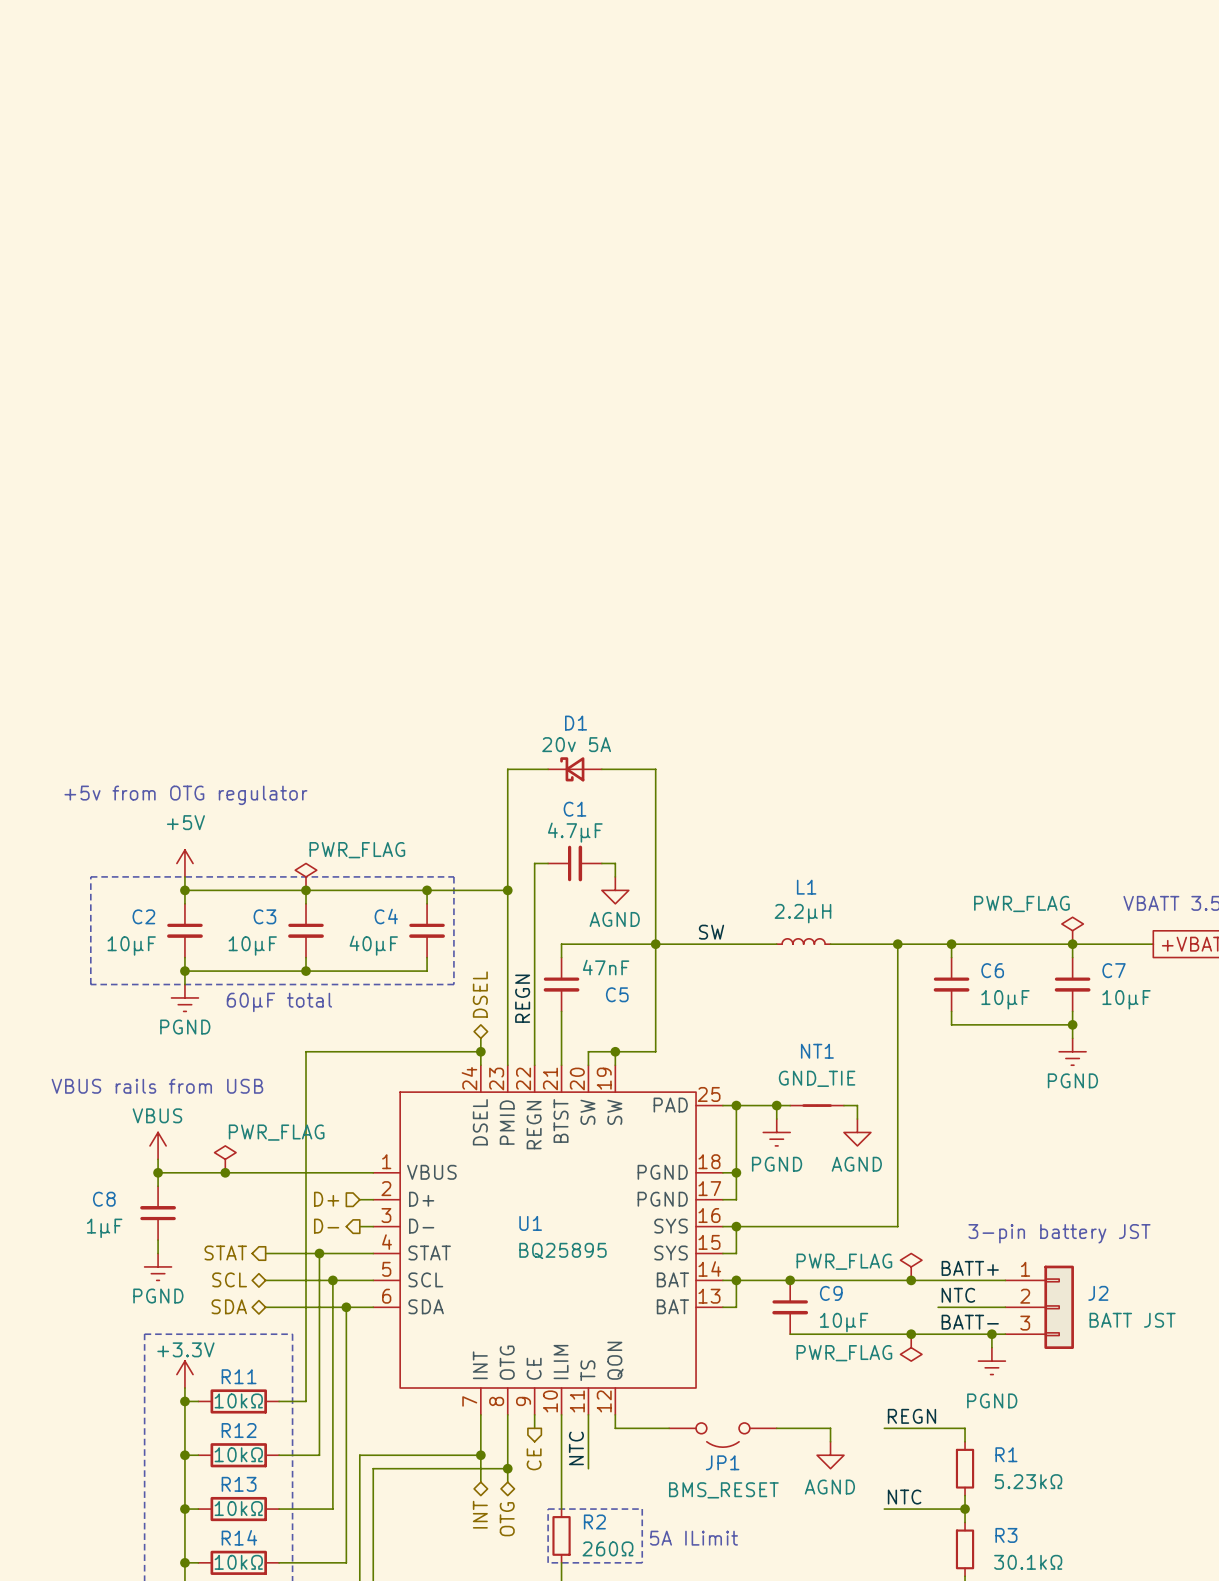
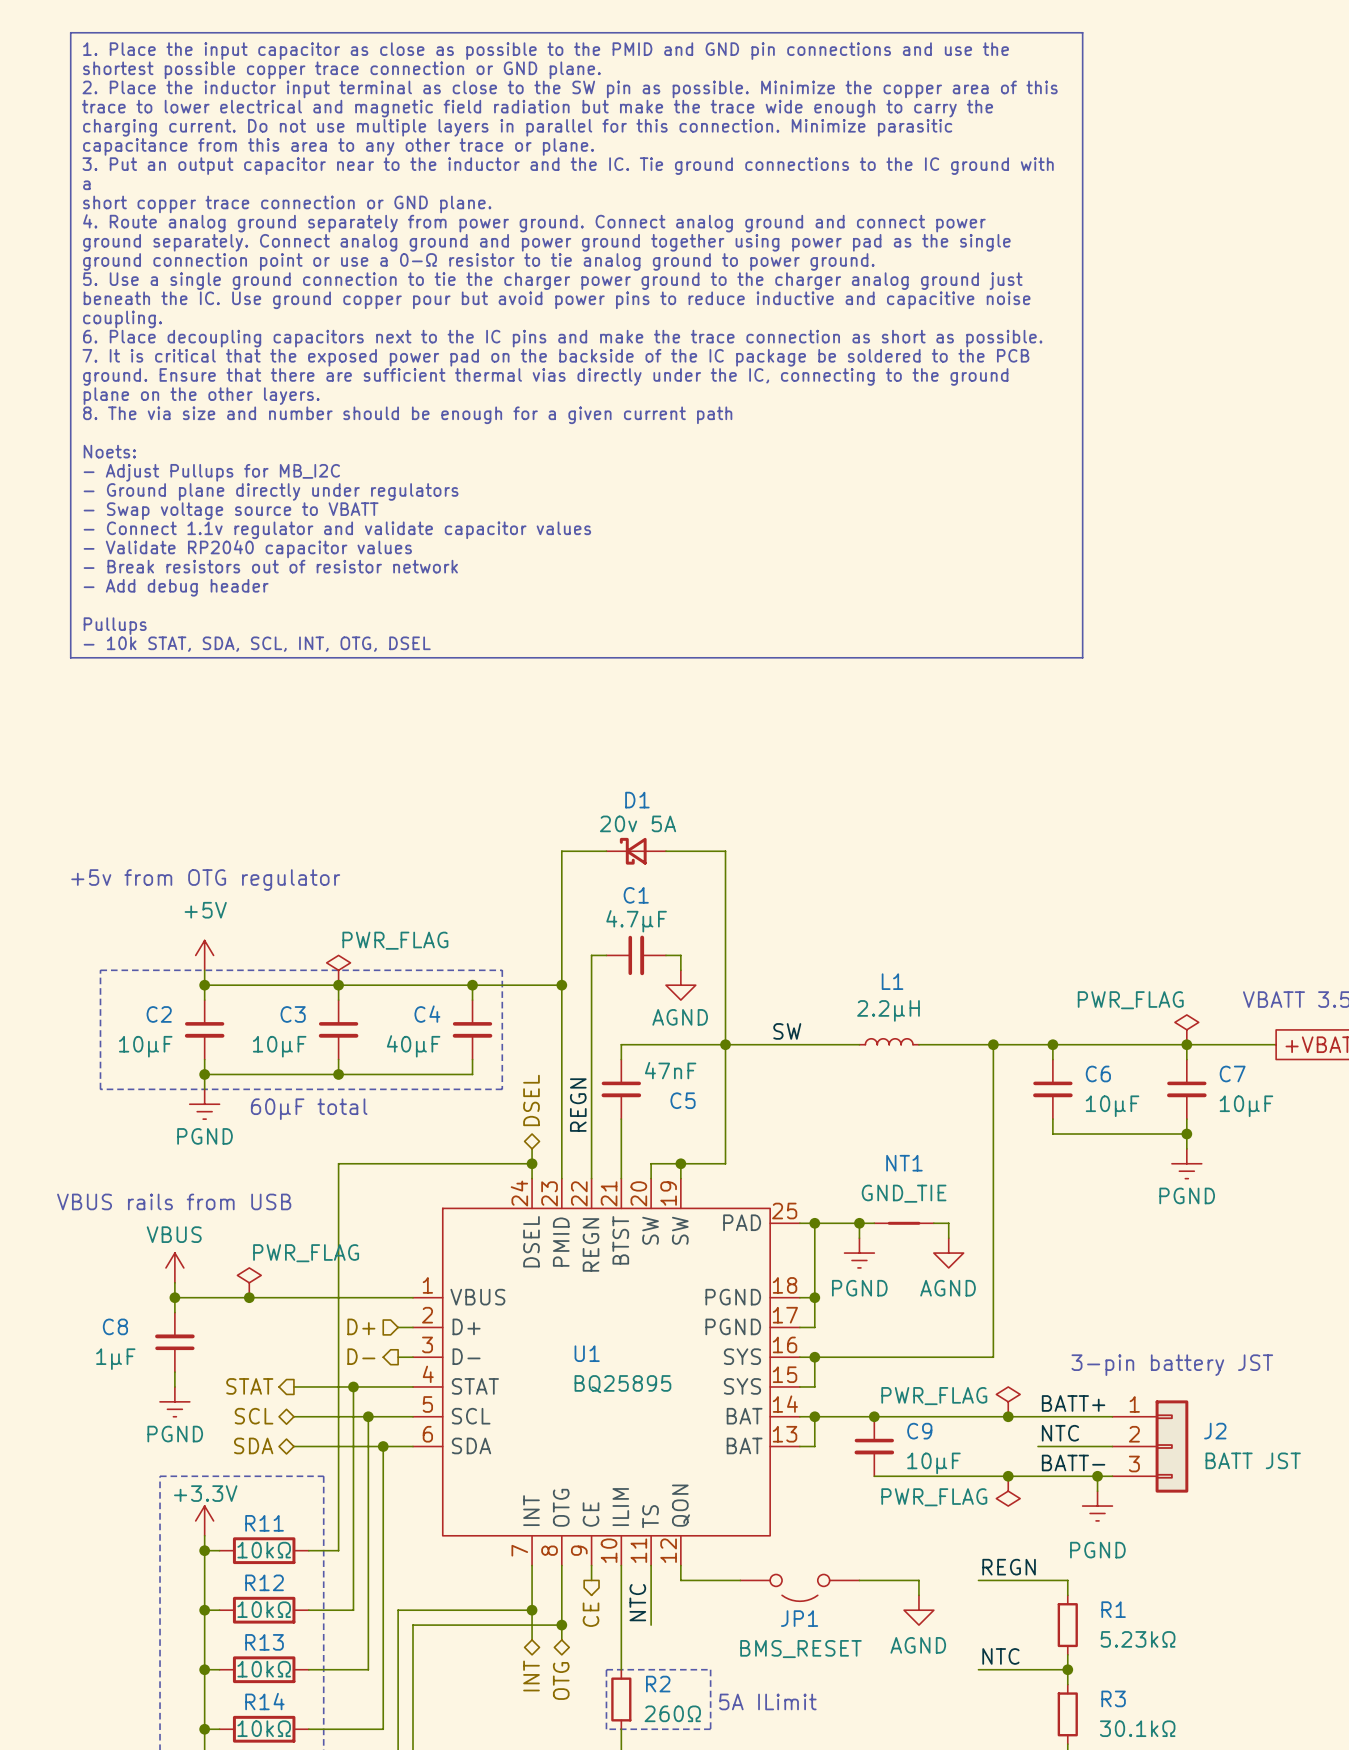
line: none -> (70, 32) (1082, 32) (1082, 657) (70, 657) (70, 32)
text: none -> 1. Place the input capacitor as close as possible to the PMID and GND pin connections and use the (546, 51)
text: none -> shortest possible copper trace connection or GND plane. (341, 70)
text: none -> 2. Place the inductor input terminal as close to the SW pin as possible. Minimize the copper area of this (570, 89)
text: none -> trace to lower electrical and magnetic field radiation but make the trace wide enough to carry the (537, 108)
text: none -> charging current. Do not use multiple layers in parallel for this connection. Minimize parasitic (517, 127)
text: none -> capacitance from this area to any other trace or plane. (338, 146)
text: none -> 3. Put an output capacitor near to the inductor and the IC. Tie ground connections to the IC ground with (568, 166)
text: none -> a (86, 185)
text: none -> short copper trace connection or GND plane. (287, 204)
text: none -> 4. Route analog ground separately from power ground. Connect analog ground and connect power (534, 223)
text: none -> ground separately. Connect analog ground and power ground together using power pad as the single (546, 242)
text: none -> ground connection point or use a 0-Ω resistor to tie analog ground to power ground. (478, 261)
text: none -> 5. Use a single ground connection to tie the charger power ground to the charger analog ground just (552, 281)
text: none -> beneath the IC. Use ground copper pour but avoid power pins to reduce inductive and capacitive noise (557, 300)
text: none -> coupling. (122, 319)
text: none -> 6. Place decoupling capacitors next to the IC pins and make the trace connection as short as possible. (562, 338)
text: none -> 7. It is critical that the exposed power pad on the backside of the IC package be soldered to the PCB (555, 357)
text: none -> ground. Ensure that there are sufficient thermal vias directly under the IC, connecting to the ground (545, 376)
text: none -> plane on the other layers. (201, 396)
text: none -> 8. The via size and number should be enough for a given current path (407, 415)
text: none -> Noets: (109, 451)
text: none -> - Adjust Pullups for MB_I2C (211, 472)
text: none -> - Ground plane directly under regulators (271, 491)
text: none -> - Swap voltage source to VBATT (231, 511)
text: none -> - Connect 1.1v regulator and validate capacitor values (337, 530)
text: none -> - Validate RP2040 capacitor values (247, 549)
text: none -> - Break resistors out of resistor network (270, 566)
text: none -> - Add debug header (176, 587)
text: none -> Pullups (115, 626)
text: none -> - 10k STAT, SDA, SCL, INT, OTG, DSEL (257, 644)

